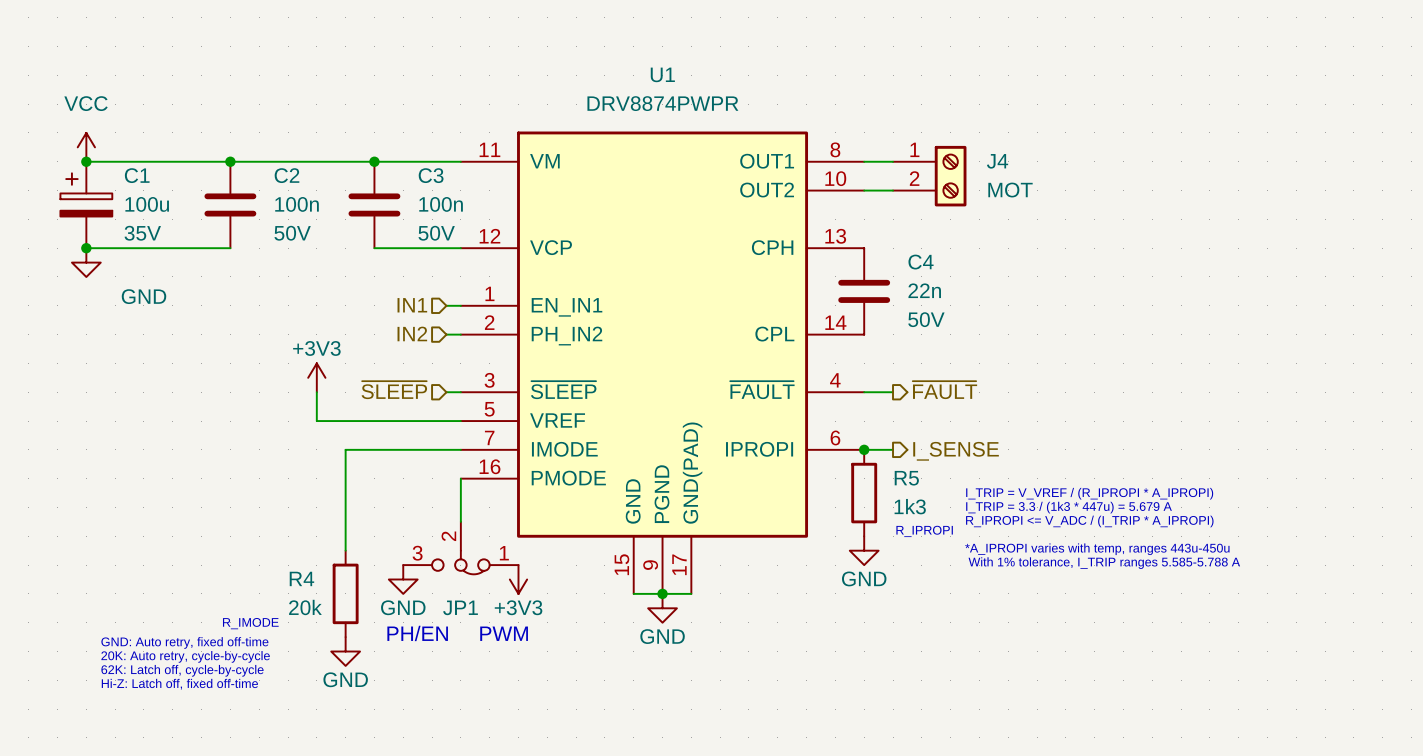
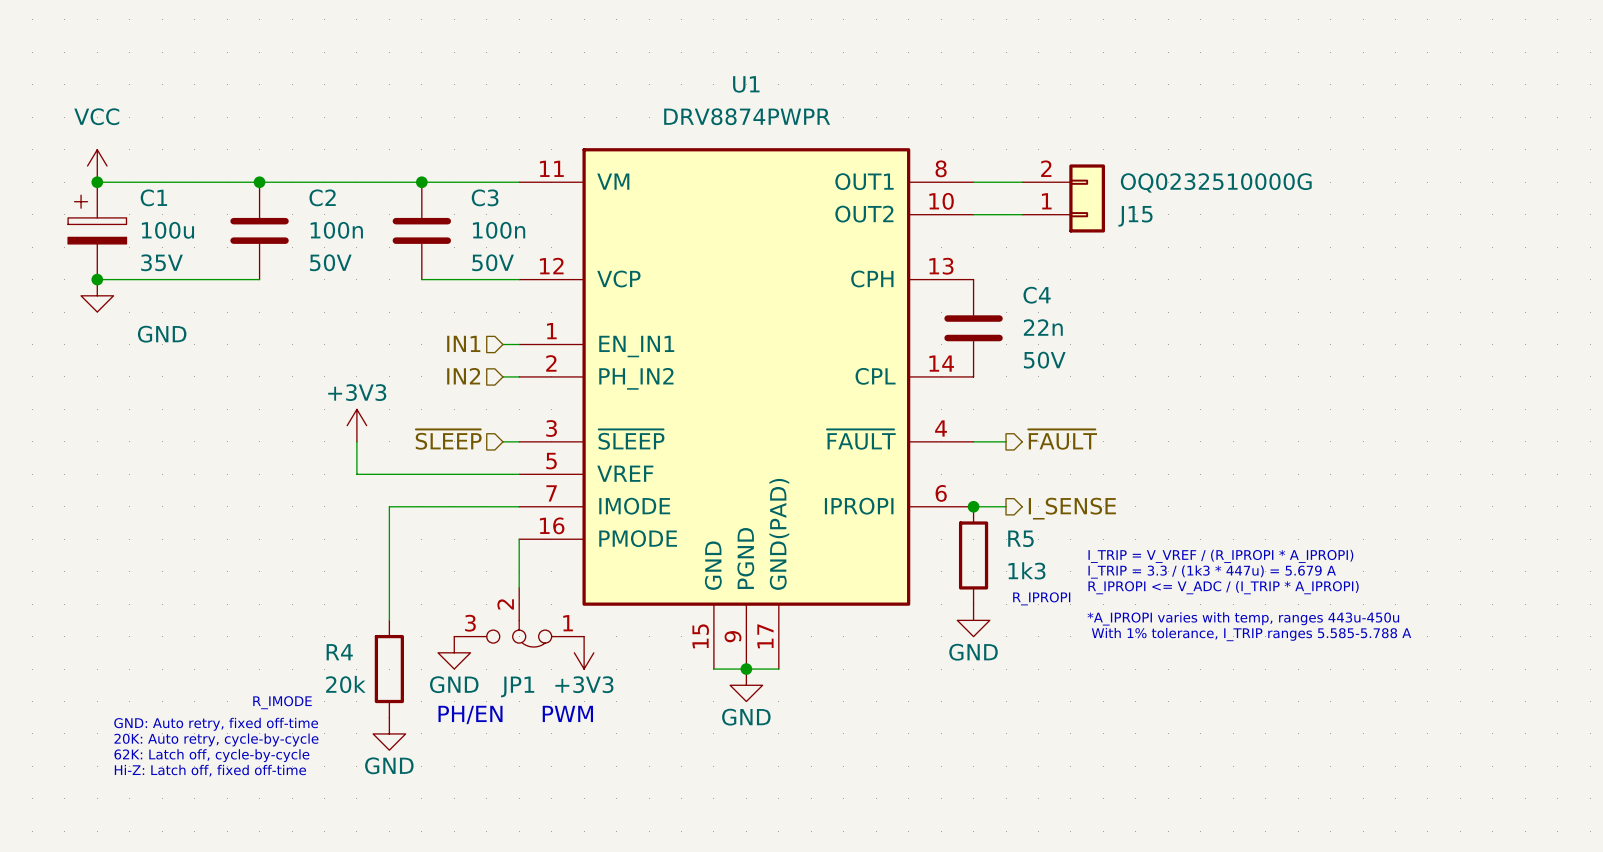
J4: MOT (929, 176) -> none
J15: none -> OQ0232510000G (1063, 198)

